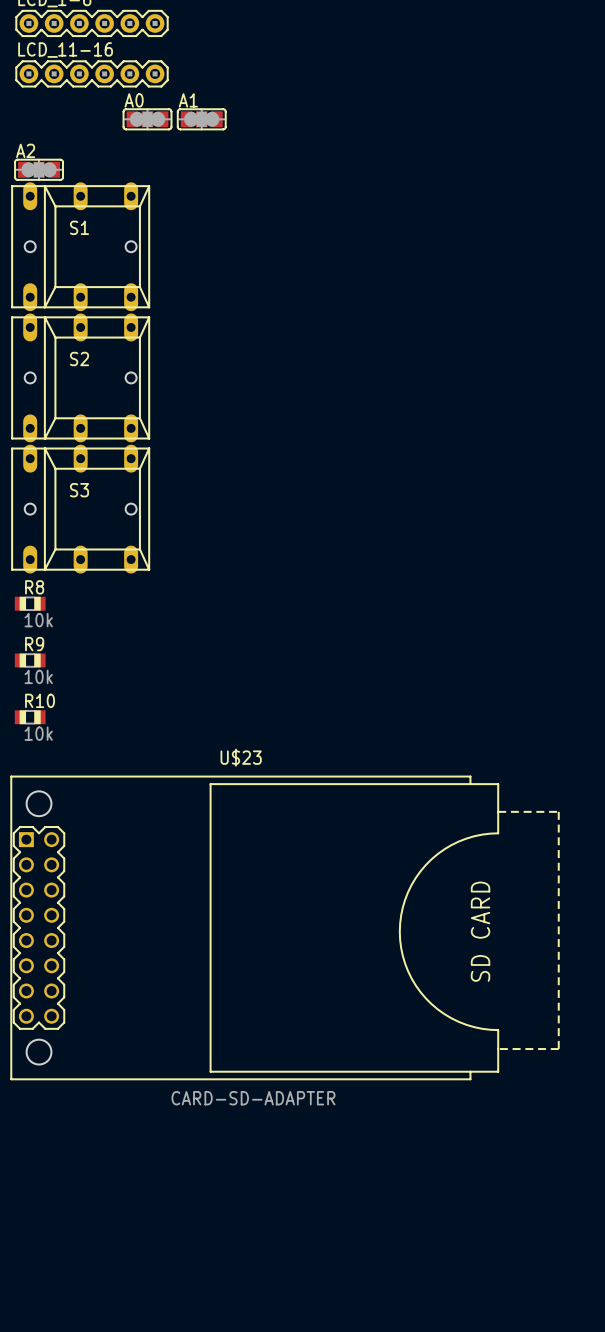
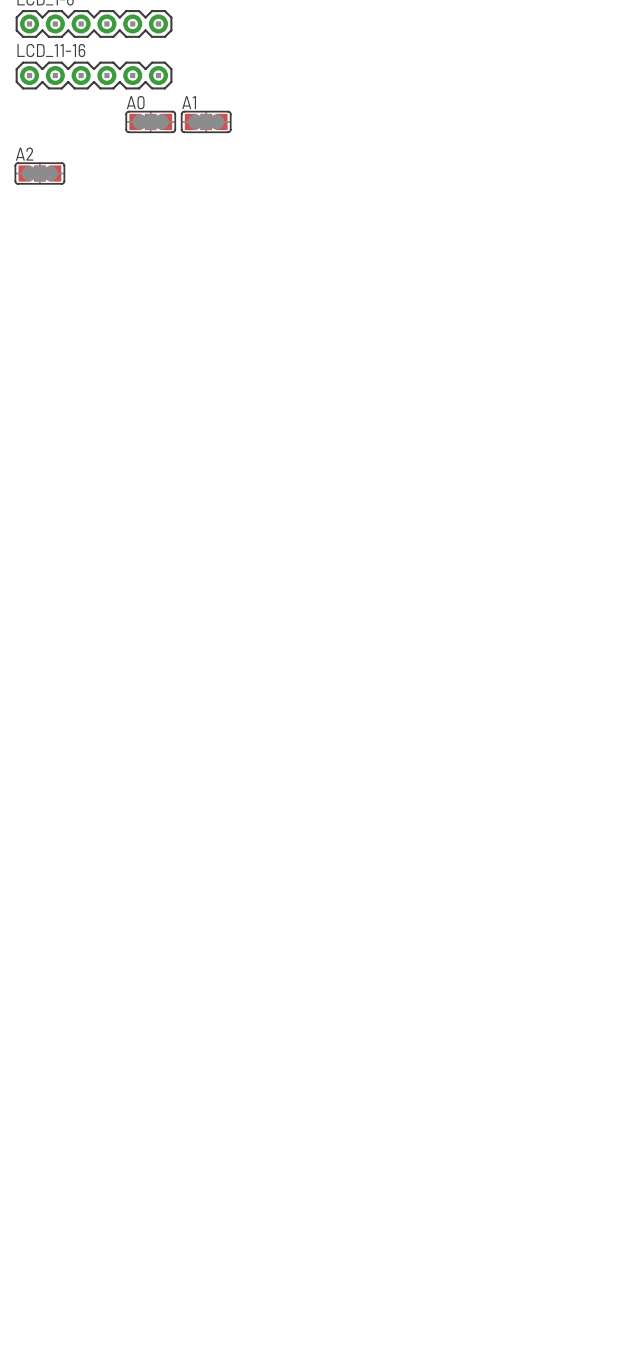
S1: (80, 246) -> none
S2: (80, 377) -> none
S3: (80, 509) -> none
R8: 10k (30, 603) -> none
R9: 10k (30, 660) -> none
R10: 10k (30, 717) -> none
U$23: CARD-SD-ADAPTER (285, 927) -> none

